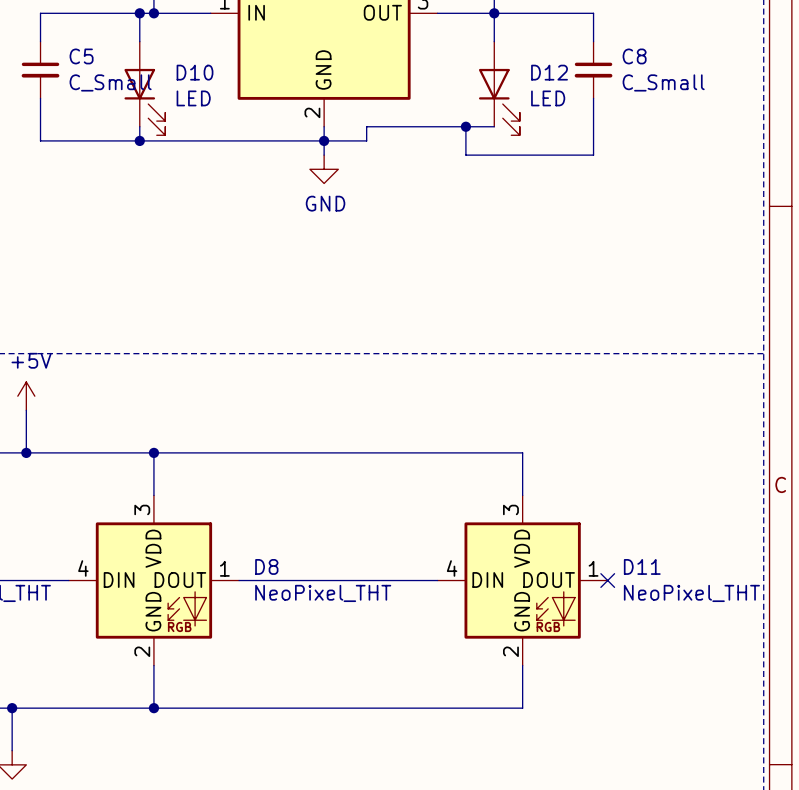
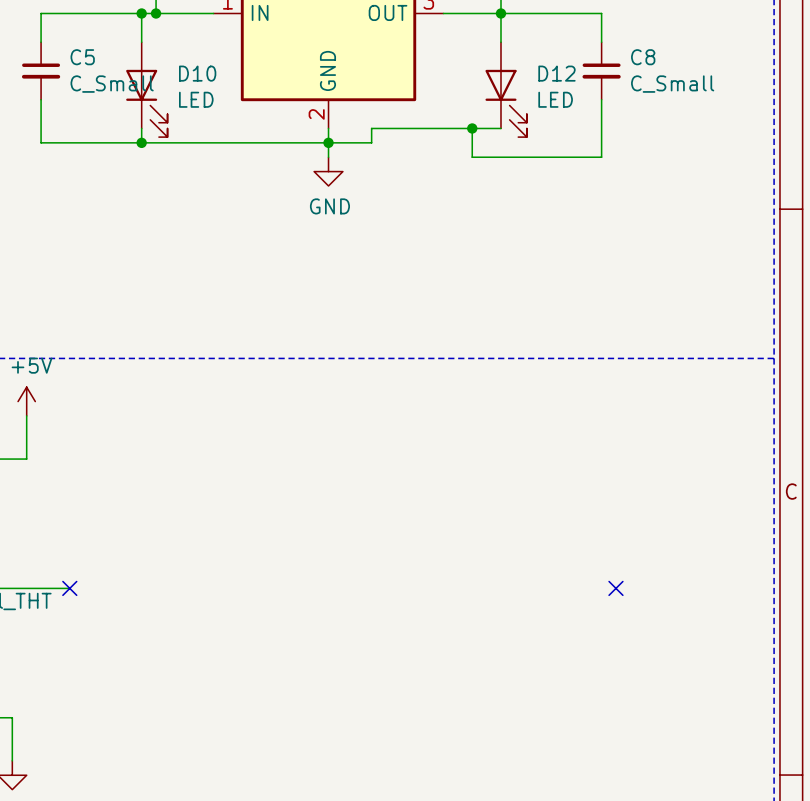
wire: (26, 452) (522, 452) (522, 495) -> none
junction: (26, 452) -> none
wire: (153, 452) (153, 495) -> none
junction: (153, 452) -> none
no-connect mark: none -> (69, 588)
D8: NeoPixel_THT (153, 580) -> none
wire: (239, 580) (437, 580) -> none
D11: NeoPixel_THT (522, 580) -> none
wire: (153, 665) (153, 708) -> none
wire: (522, 665) (522, 708) (12, 708) -> none
junction: (12, 708) -> none
junction: (153, 708) -> none

